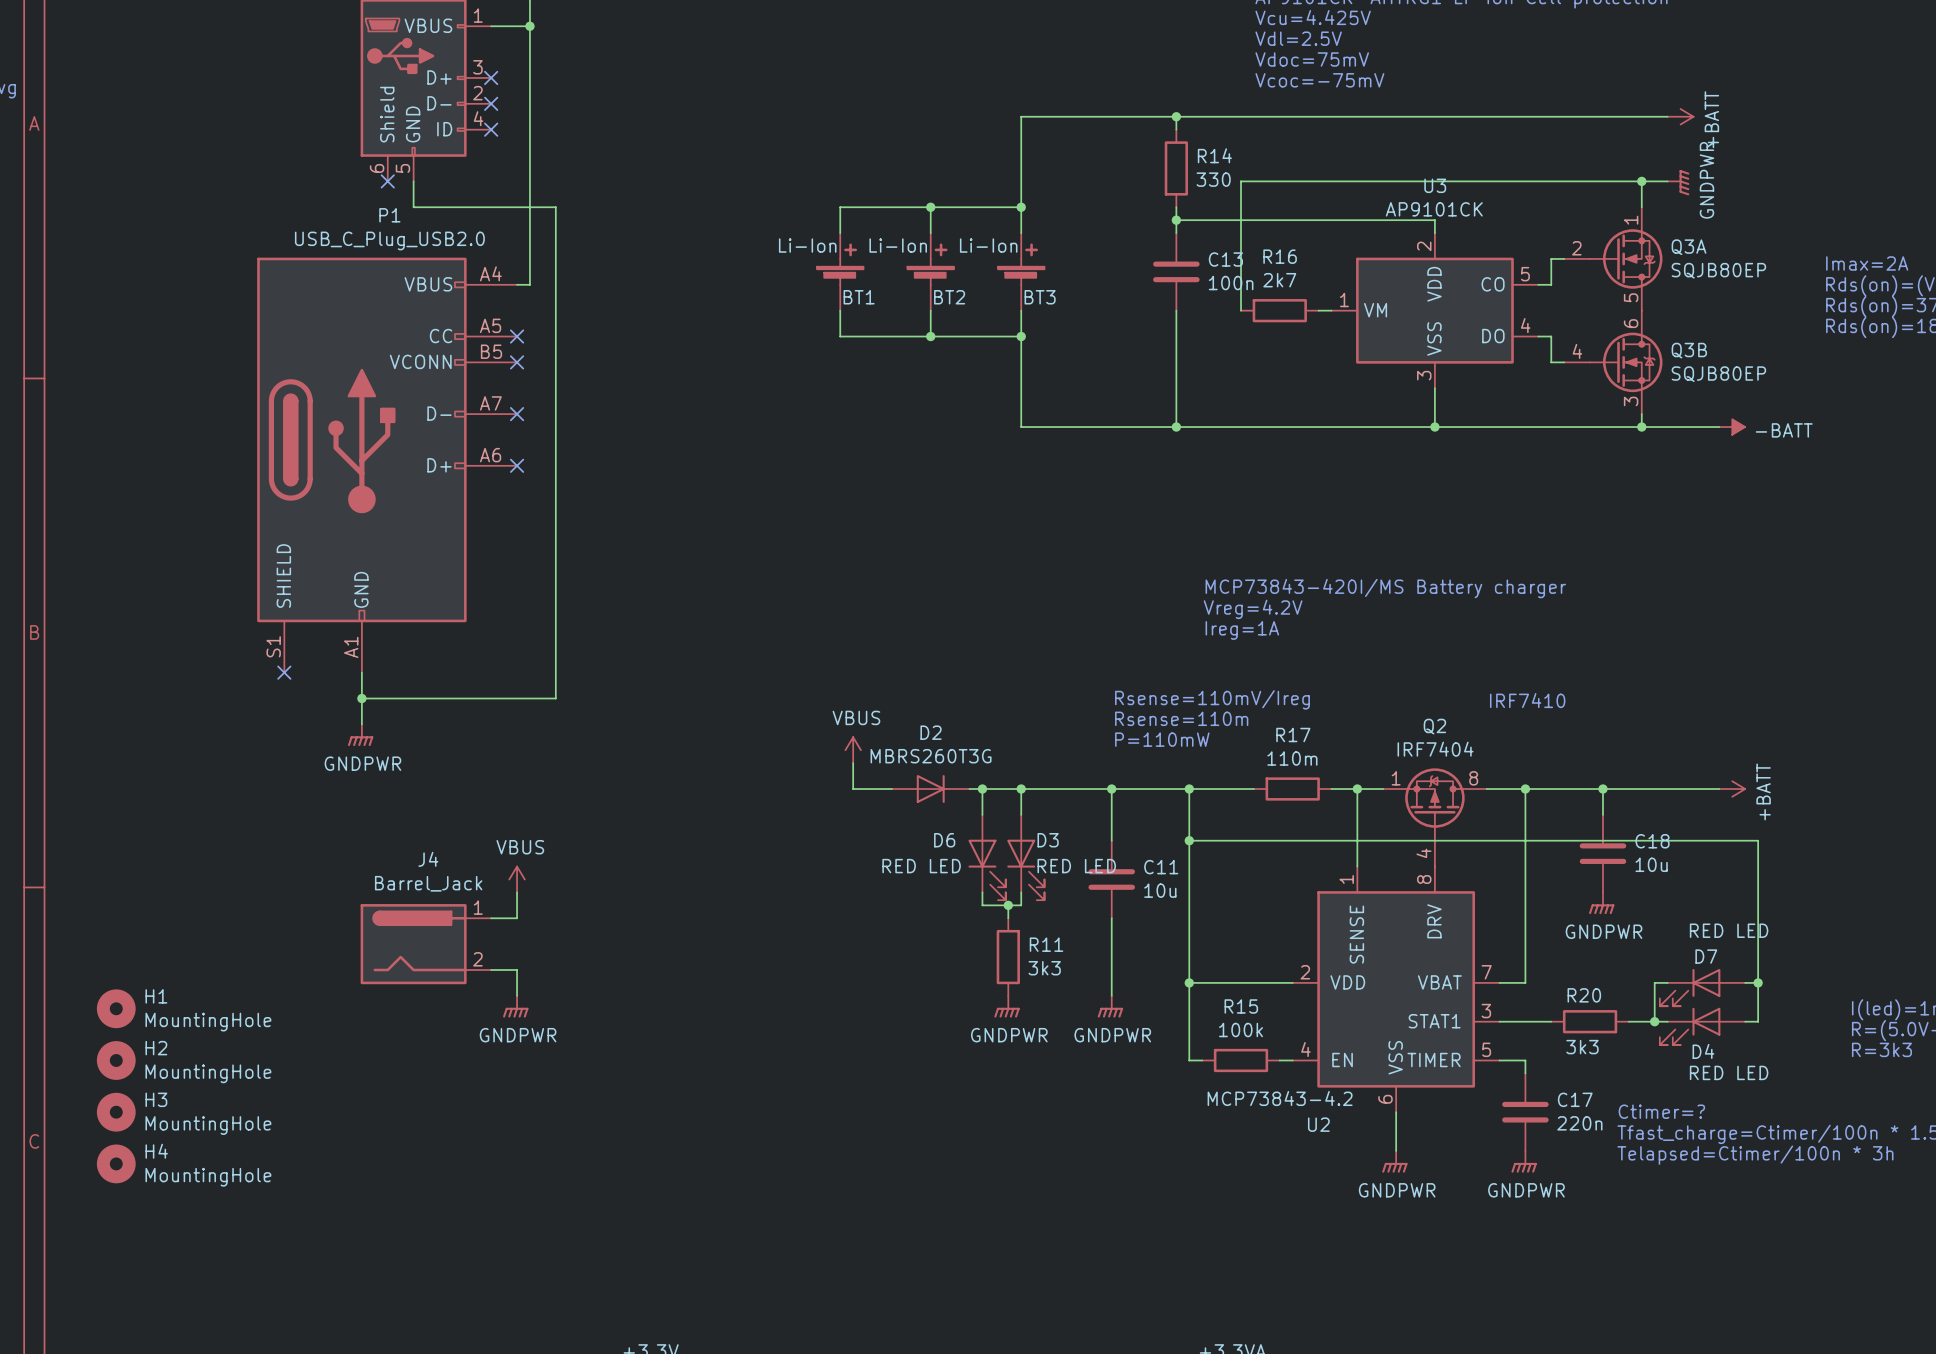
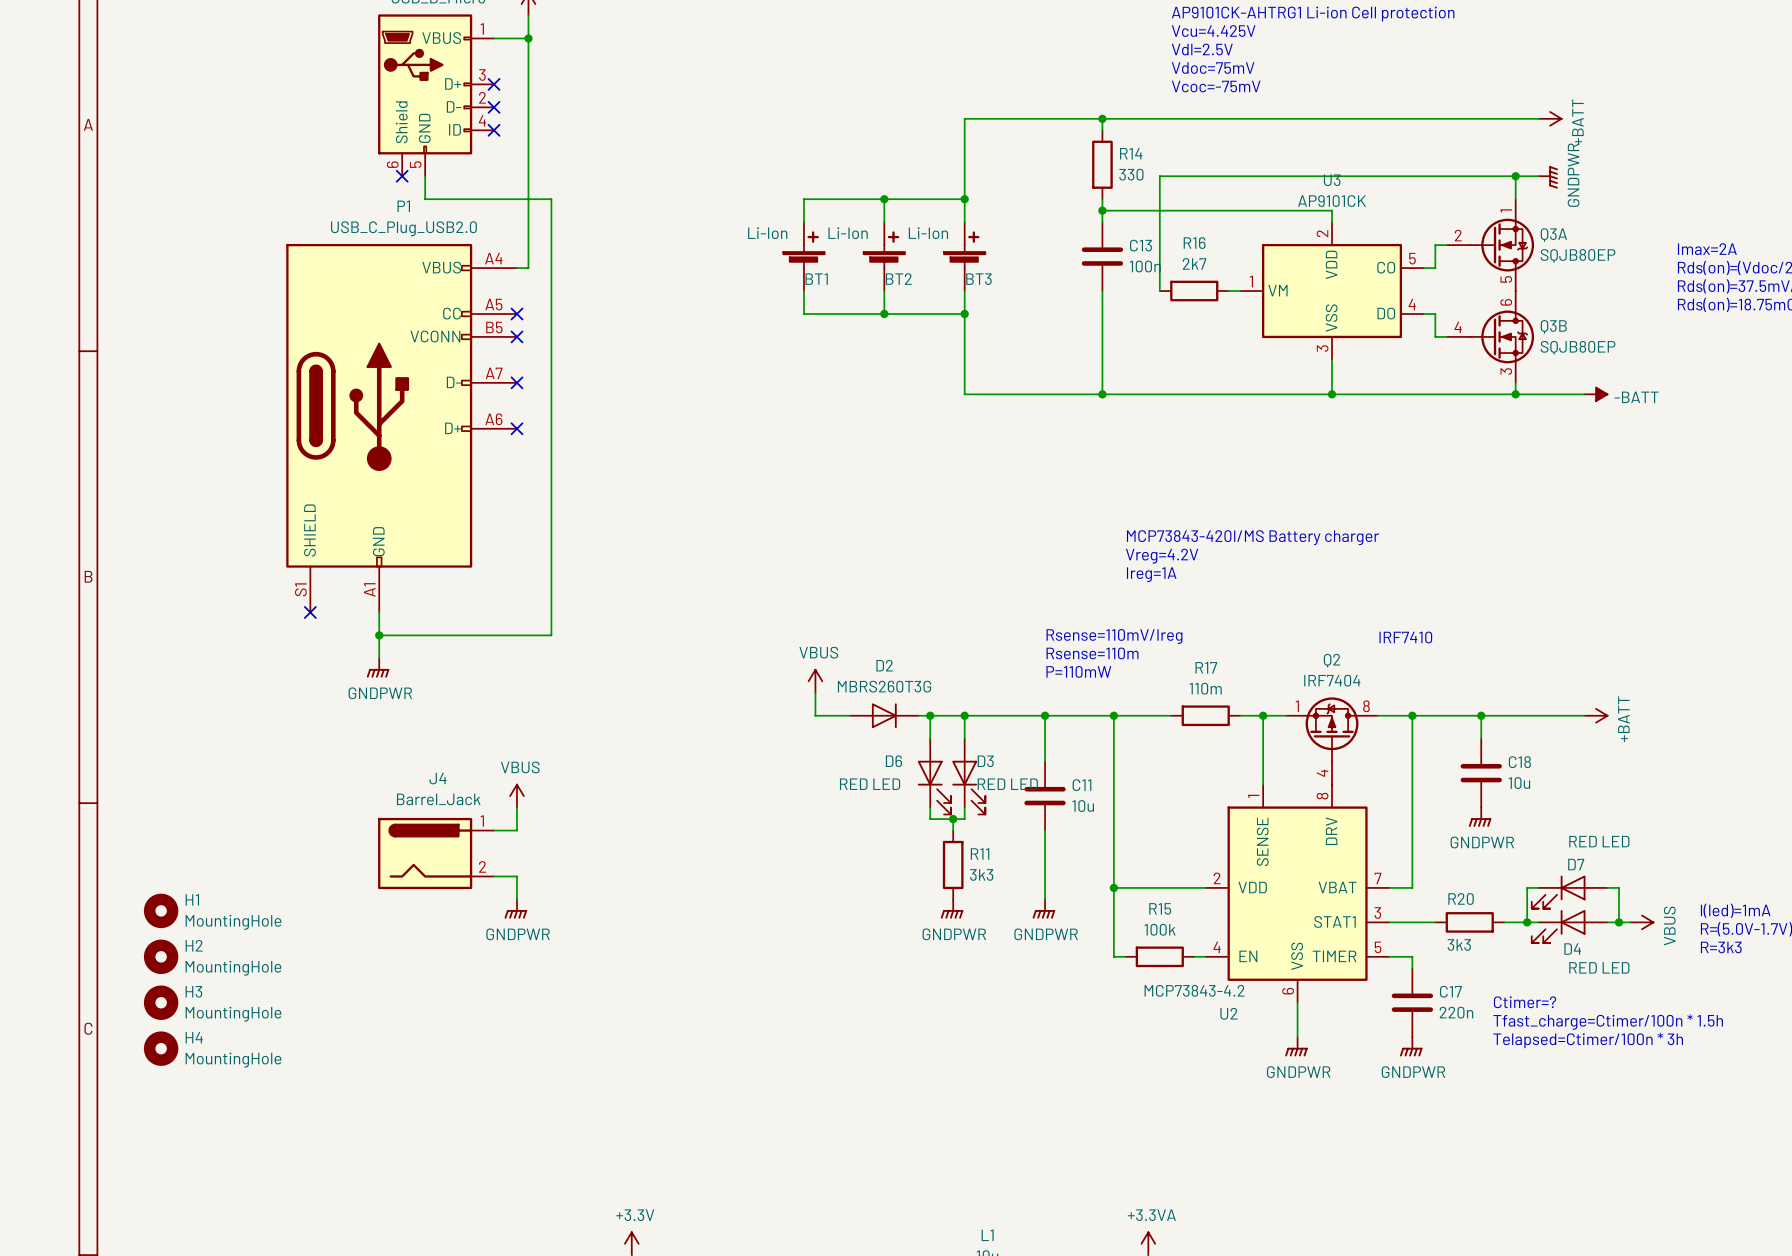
wire: (1189, 840) (1758, 840) (1758, 982) -> none
junction: (1189, 840) -> none
junction position: (1758, 982) -> (1618, 922)
wire: none -> (1618, 922) (1630, 922)
power symbol: none -> VBUS (1641, 922)

